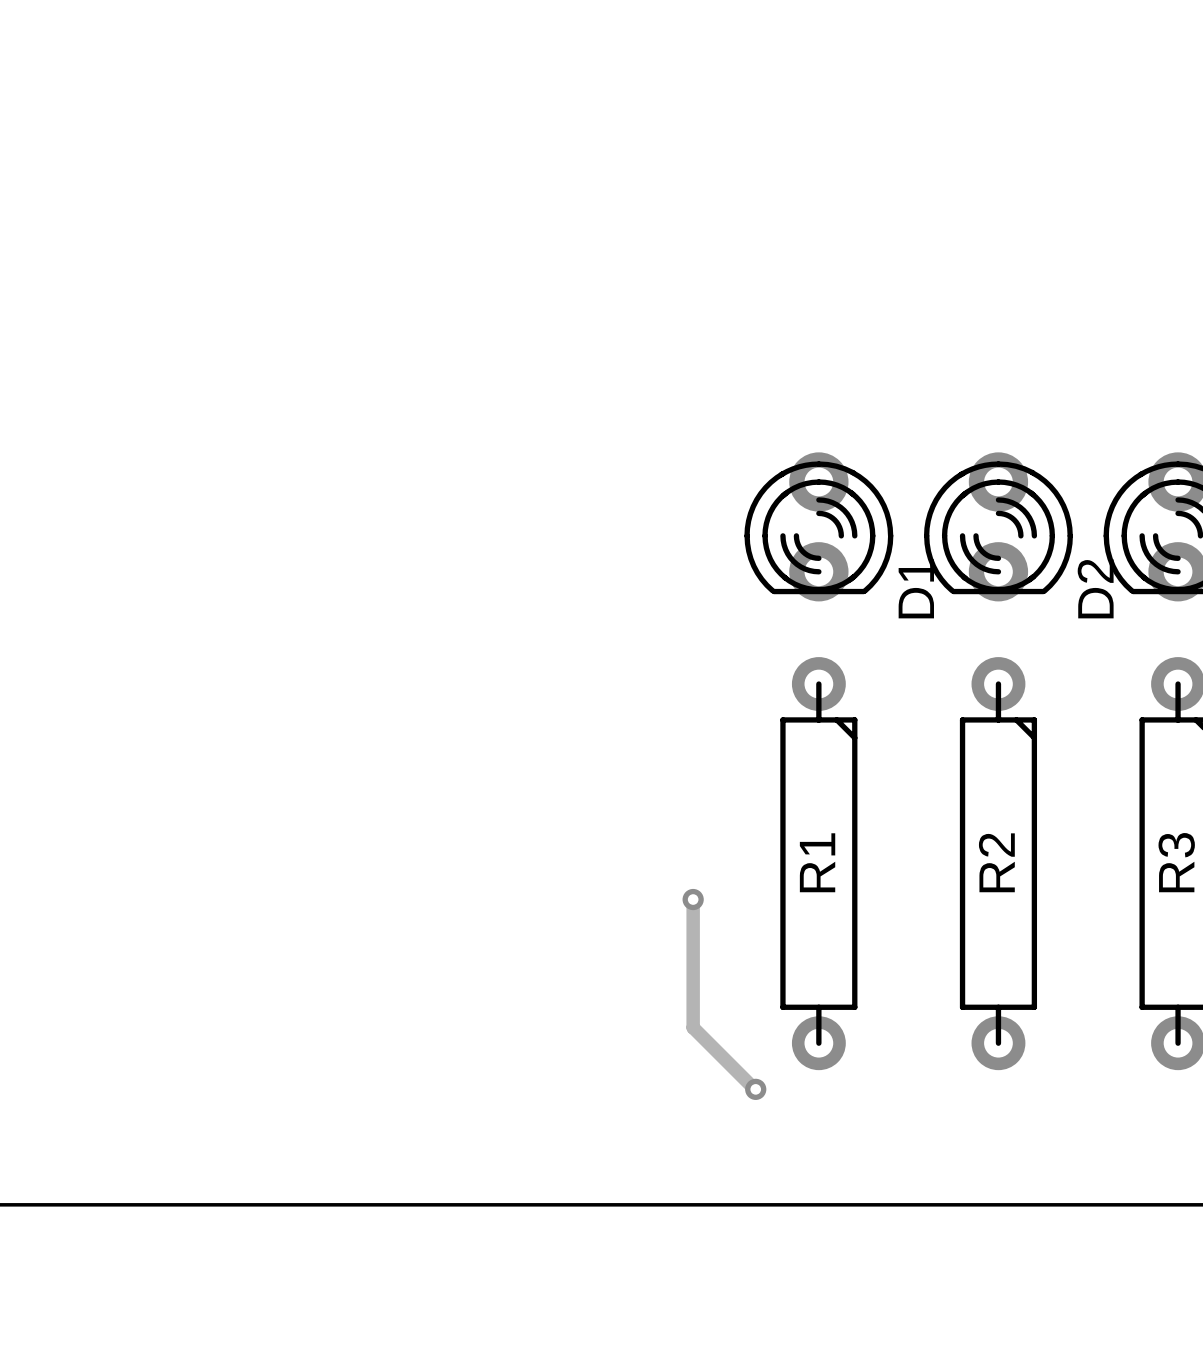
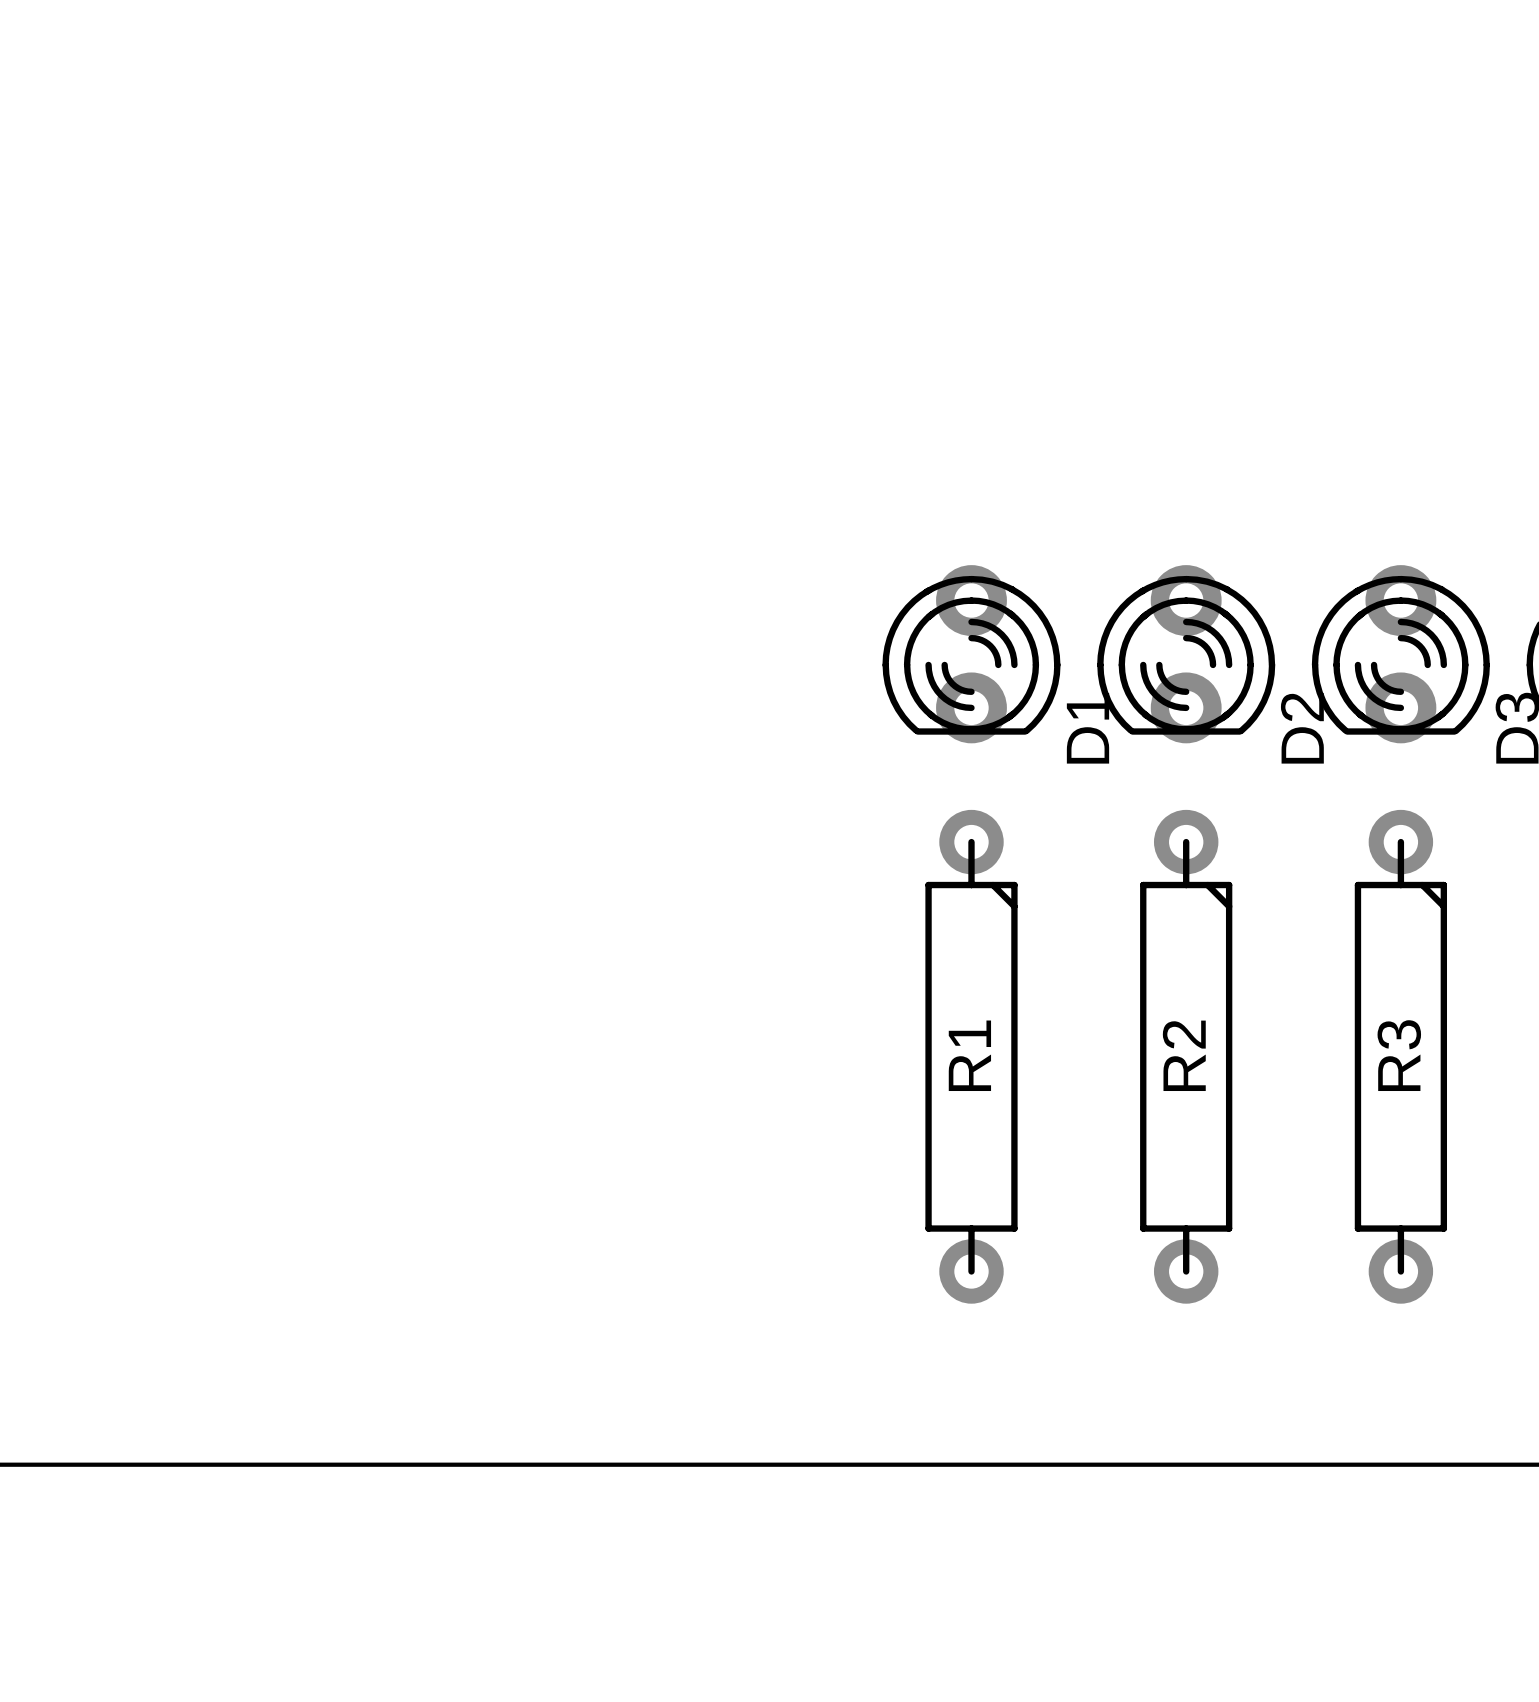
track: (693, 899) (693, 1027) (755, 1089) -> none
via: (693, 899) -> none
via: (755, 1089) -> none

